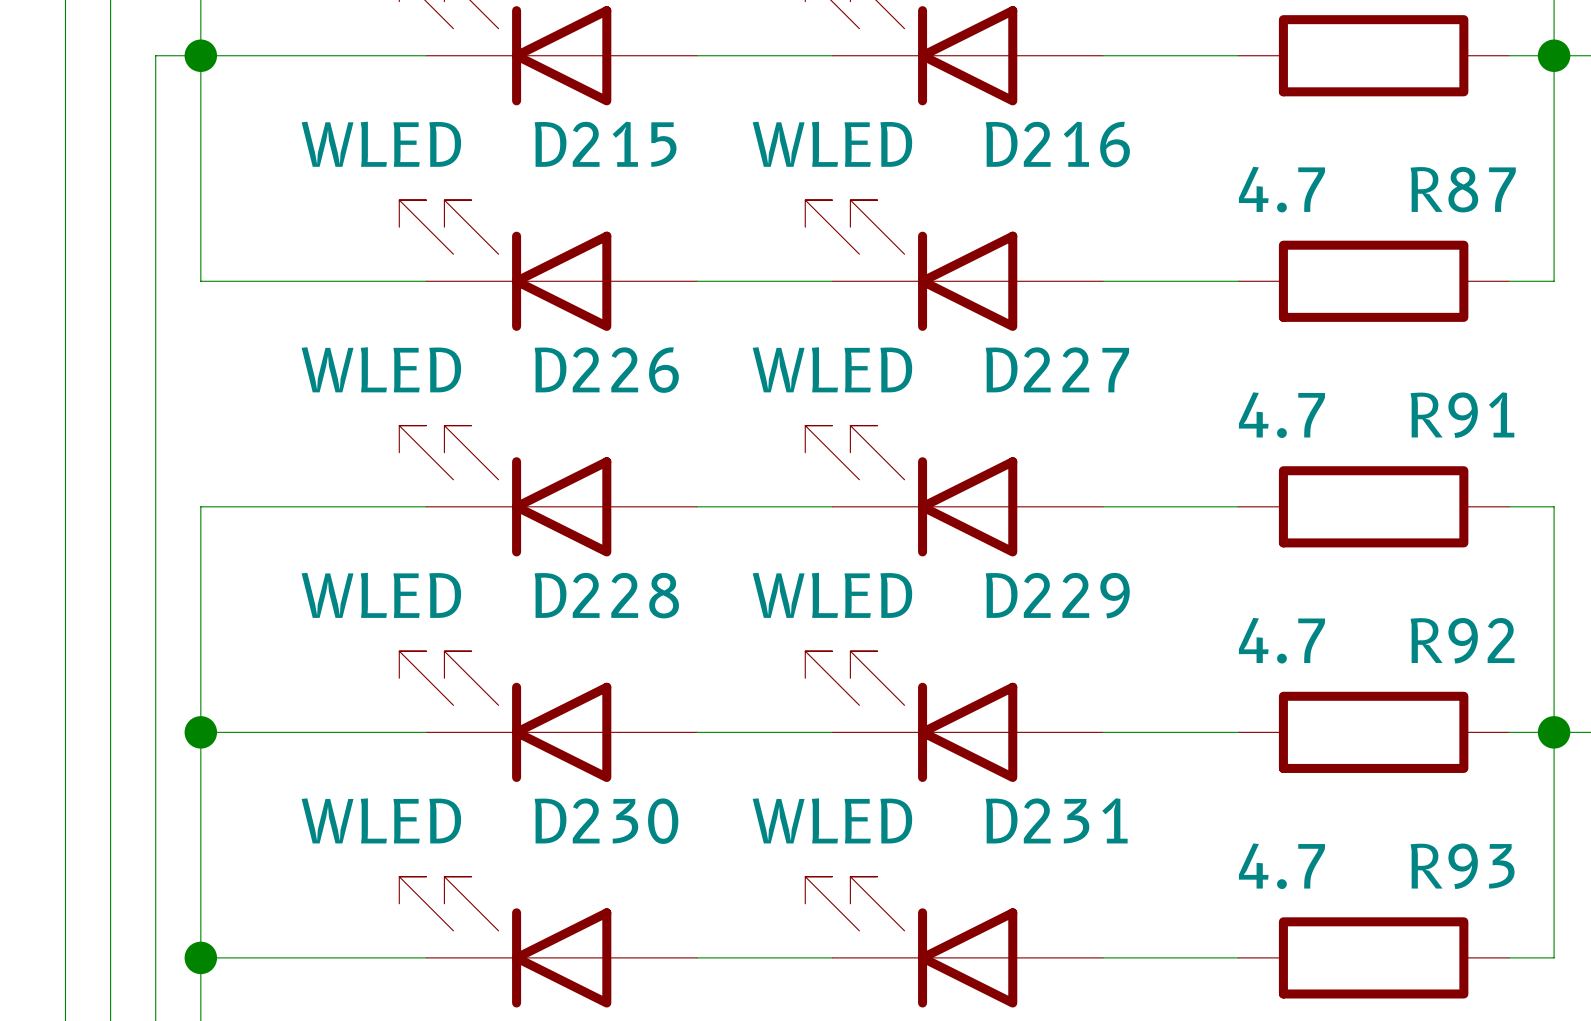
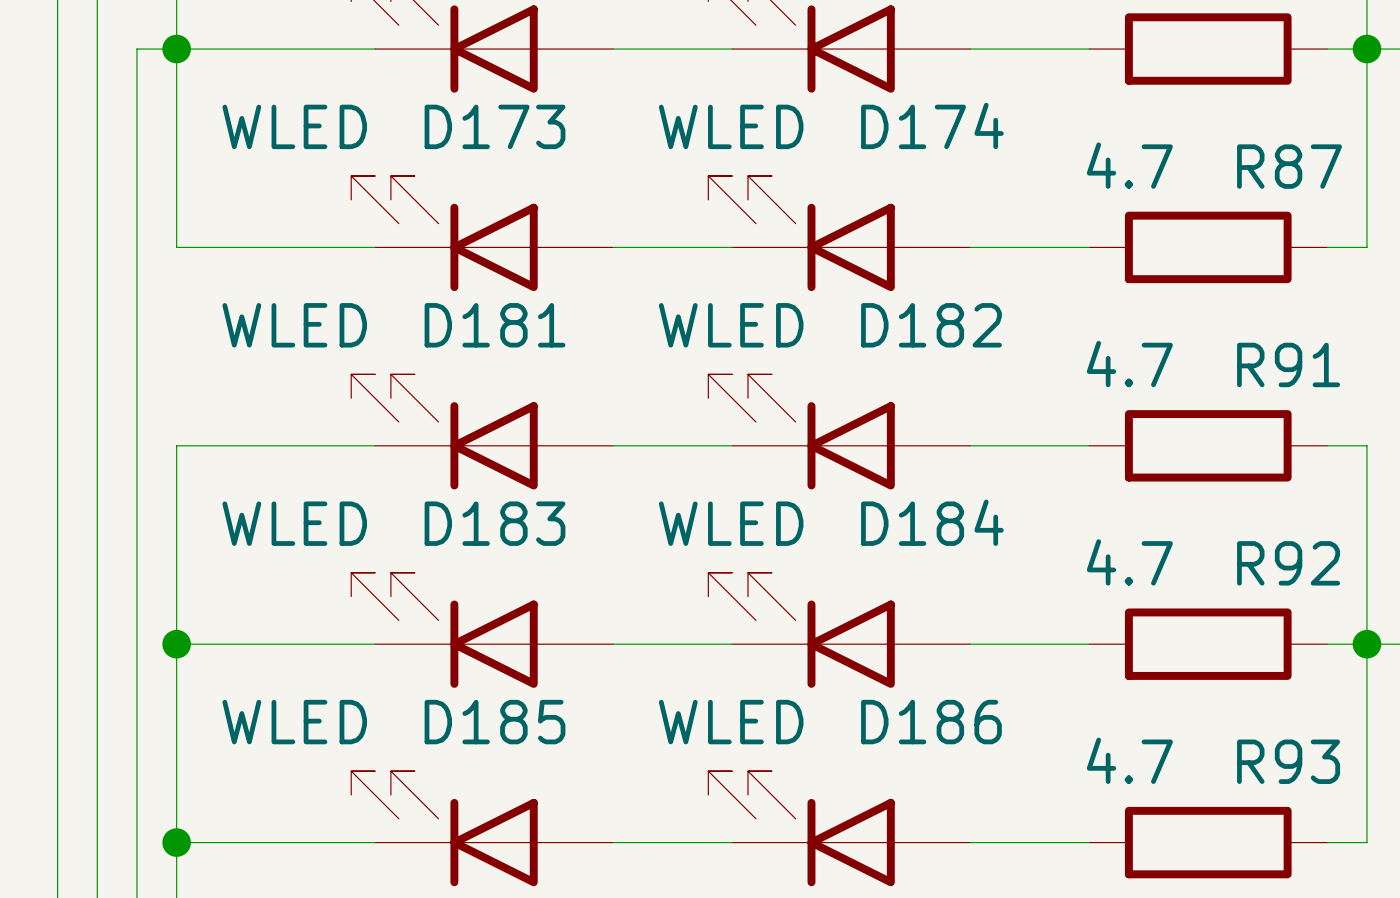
D215 value position: WLED (381, 144) -> WLED (294, 126)
D215 name: D215 (605, 144) -> D173 (495, 126)
D216 name: D216 (1057, 144) -> D174 (932, 125)
D226 value position: WLED (381, 369) -> WLED (294, 325)
D227 name: D227 (1057, 369) -> D182 (931, 325)
D226 name: D226 (606, 370) -> D181 (495, 325)
D228 value position: WLED (381, 595) -> WLED (294, 523)
D228 name: D228 (606, 595) -> D183 (495, 523)
D229 name: D229 (1057, 595) -> D184 (932, 522)
D230 value position: WLED (381, 820) -> WLED (294, 722)
D231 name: D231 (1056, 820) -> D186 (931, 722)
D230 name: D230 (606, 821) -> D185 (495, 722)

